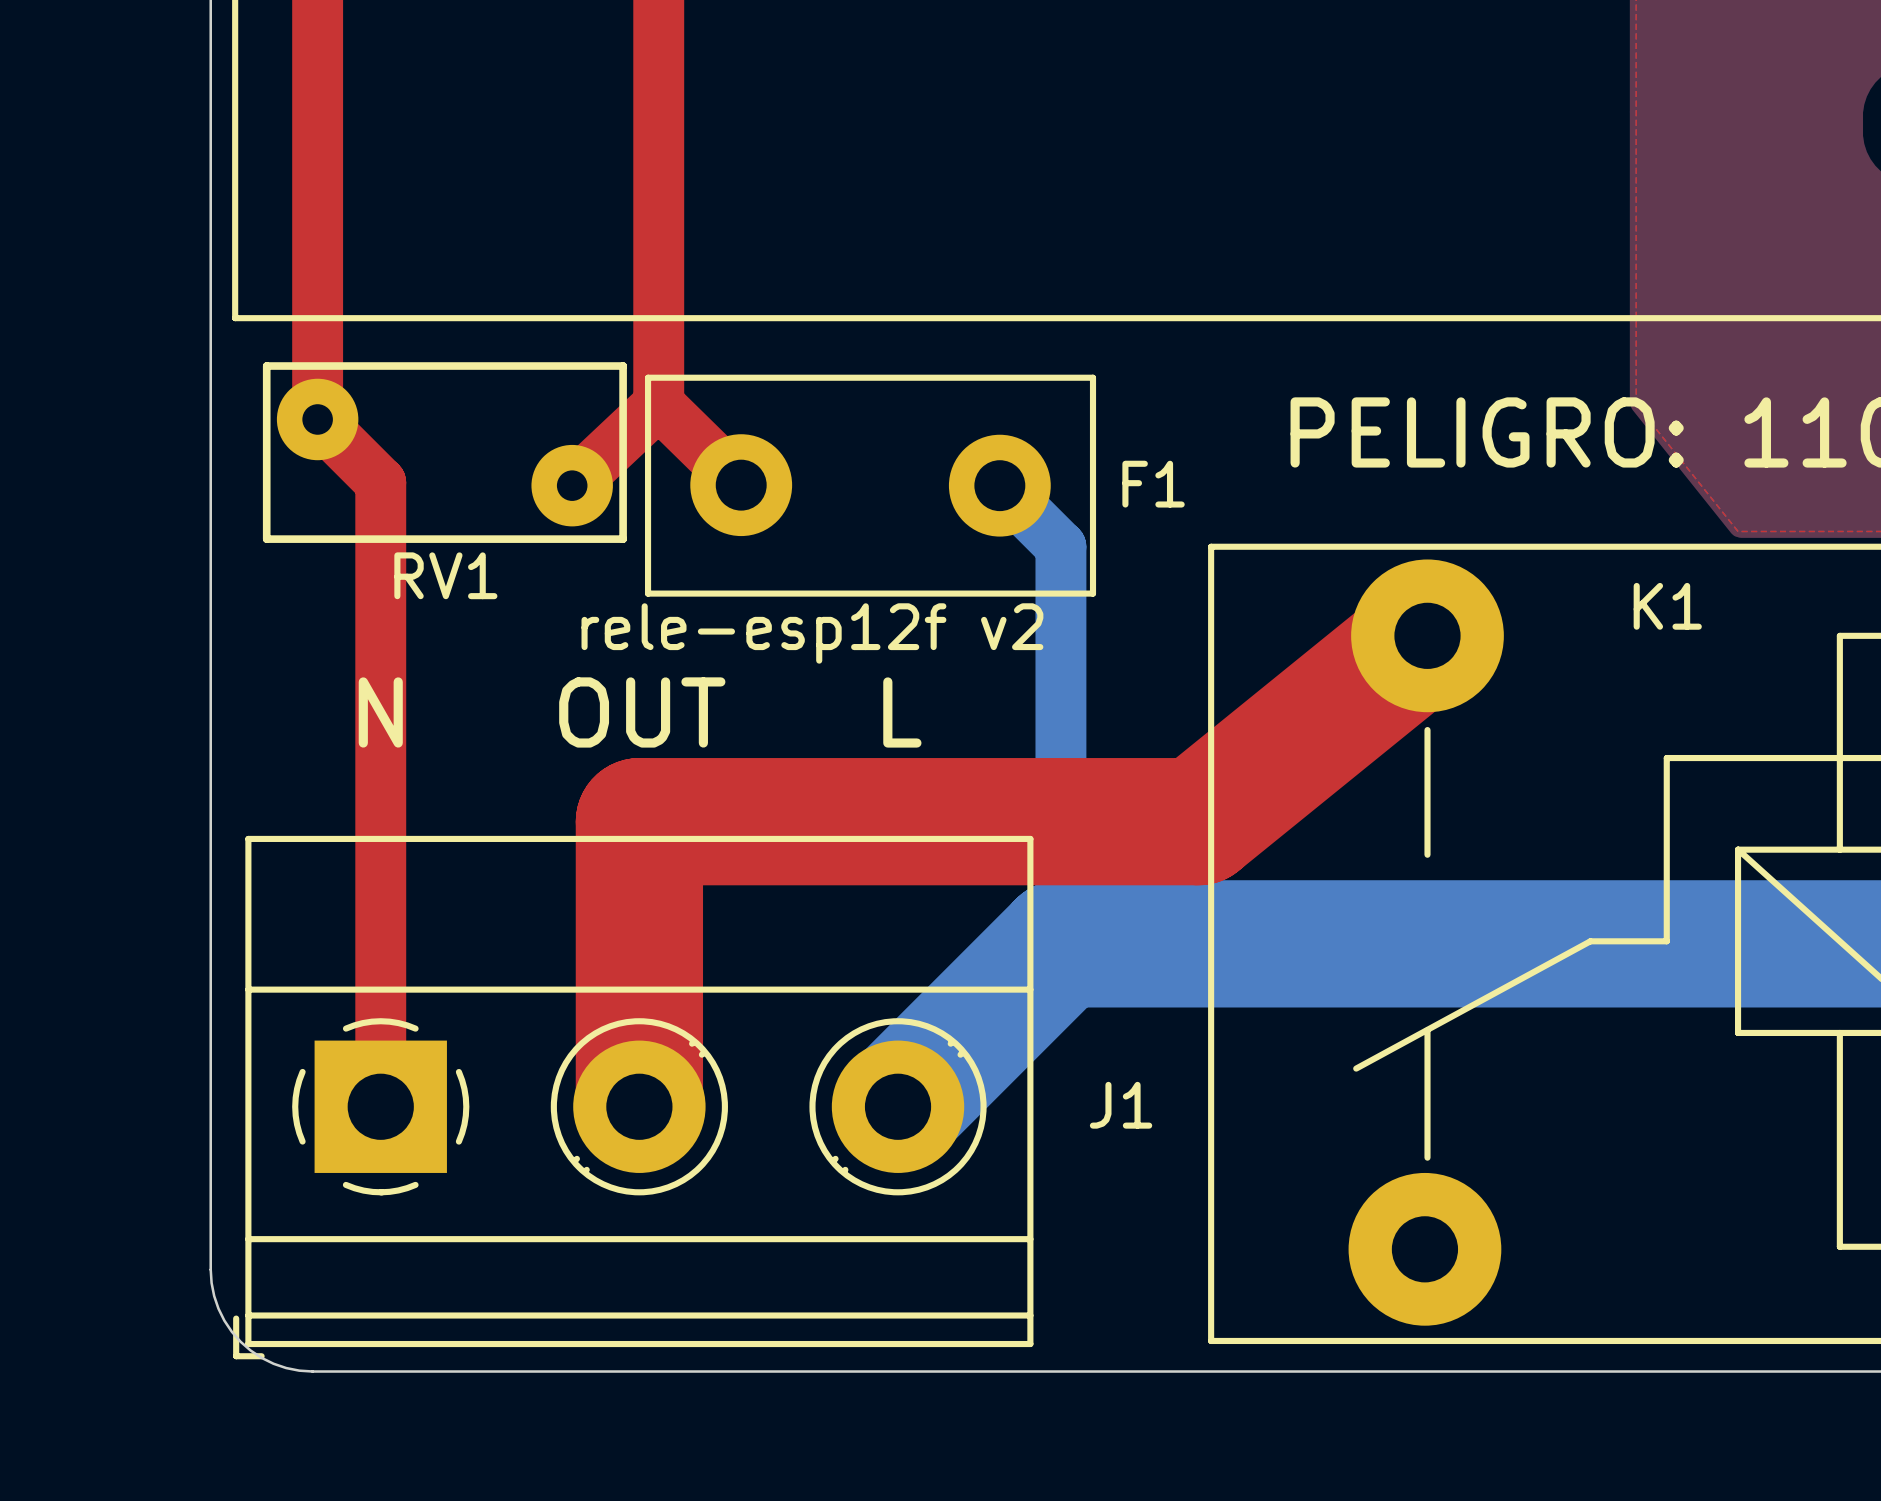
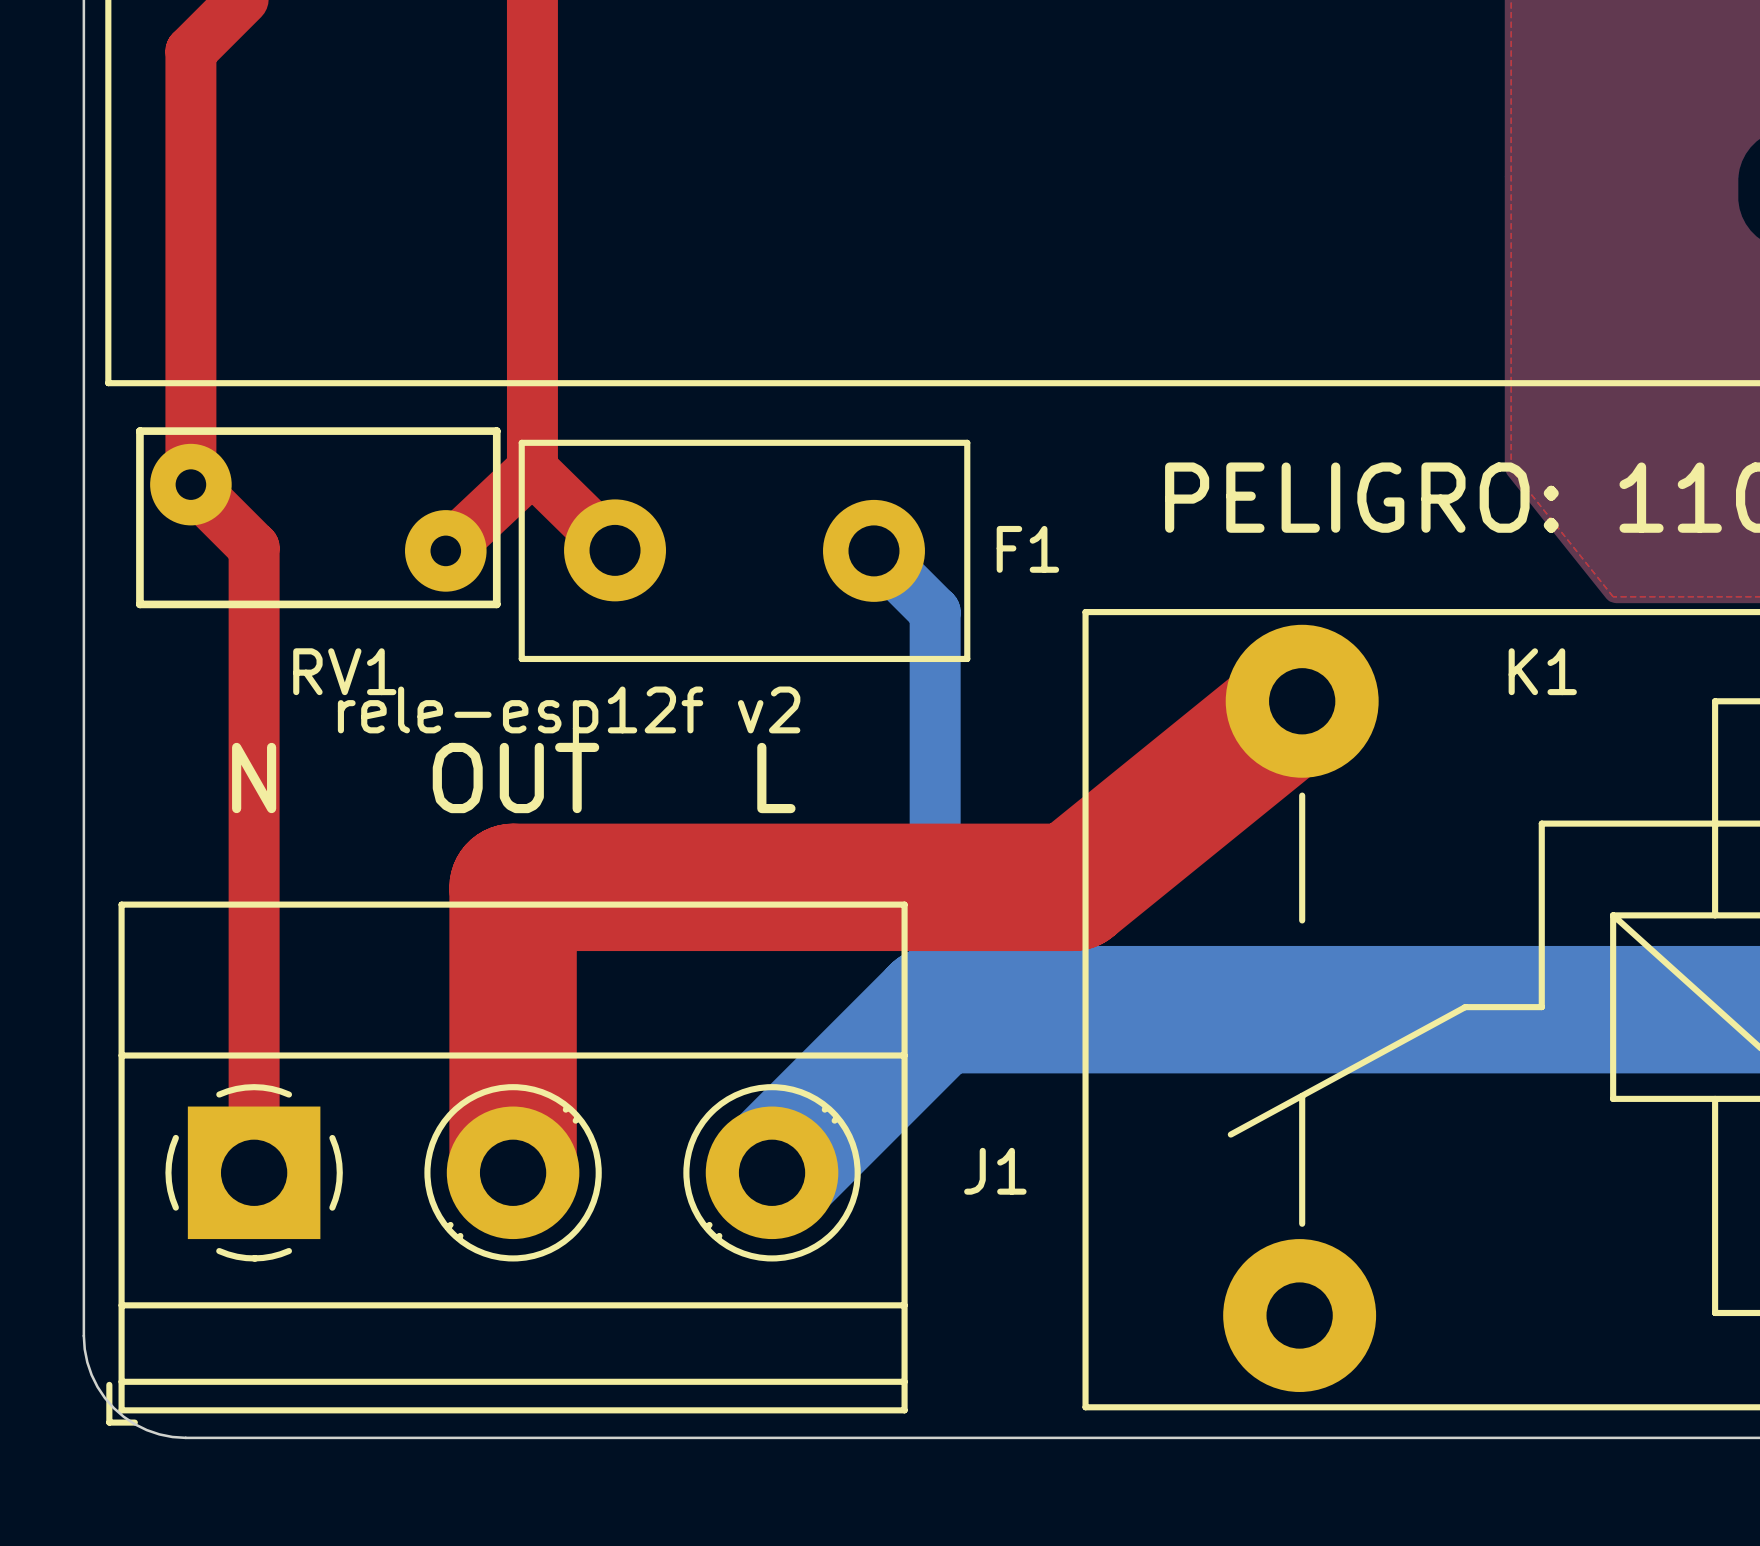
RV1 name position: RV1 (445, 575) -> RV1 (344, 671)
text position: rele-esp12f v2 (812, 633) -> rele-esp12f v2 (569, 716)

